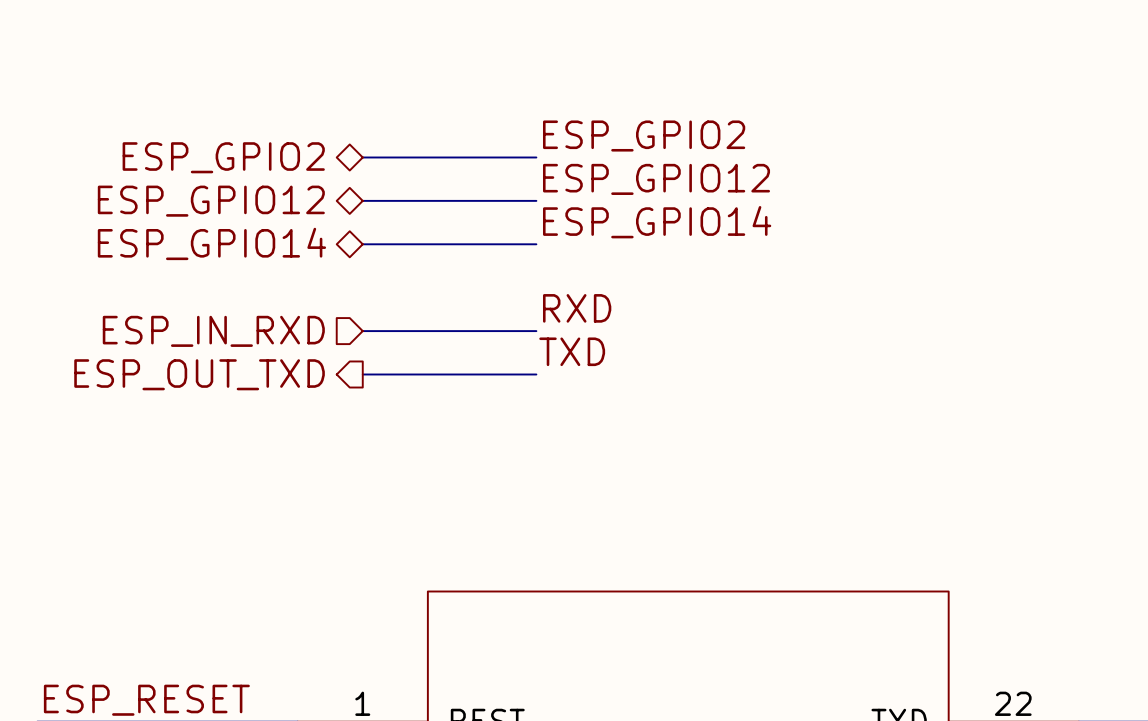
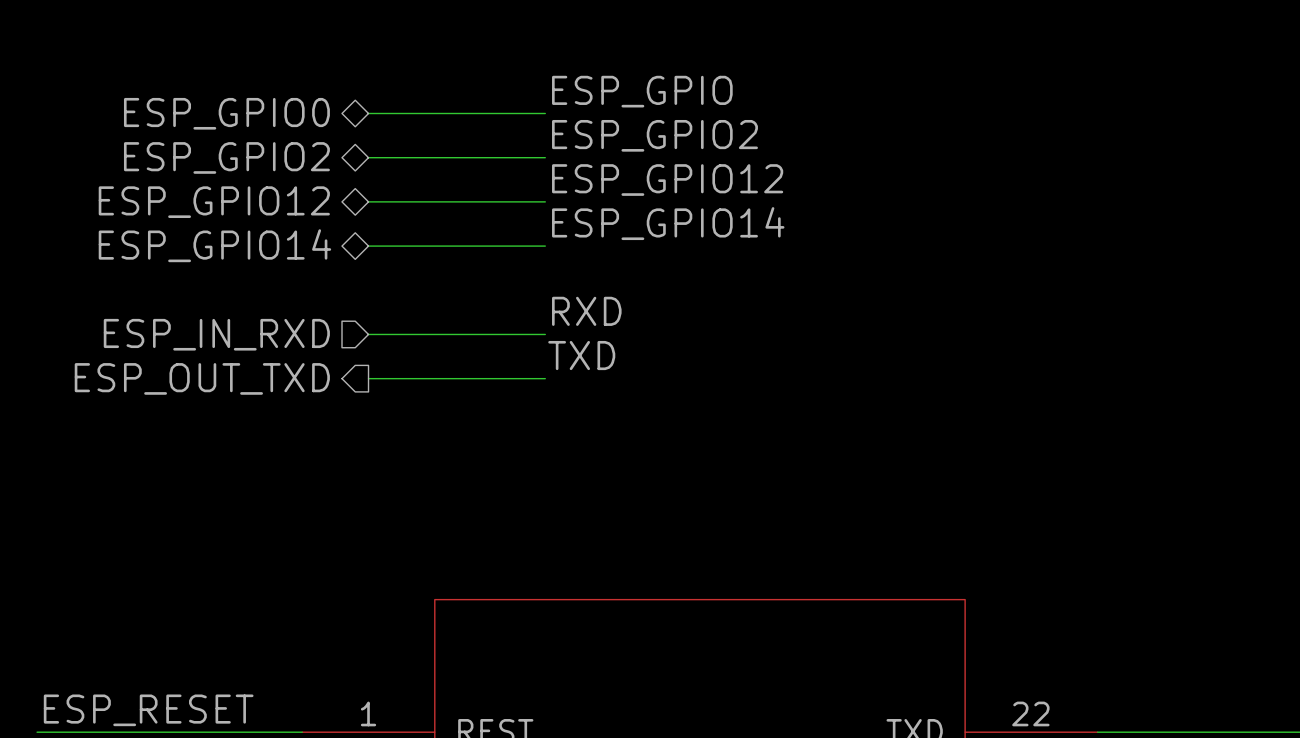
label: none -> ESP_GPIO (642, 91)
hierarchical label: none -> ESP_GPIO0 (226, 113)
wire: none -> (368, 113) (545, 113)

